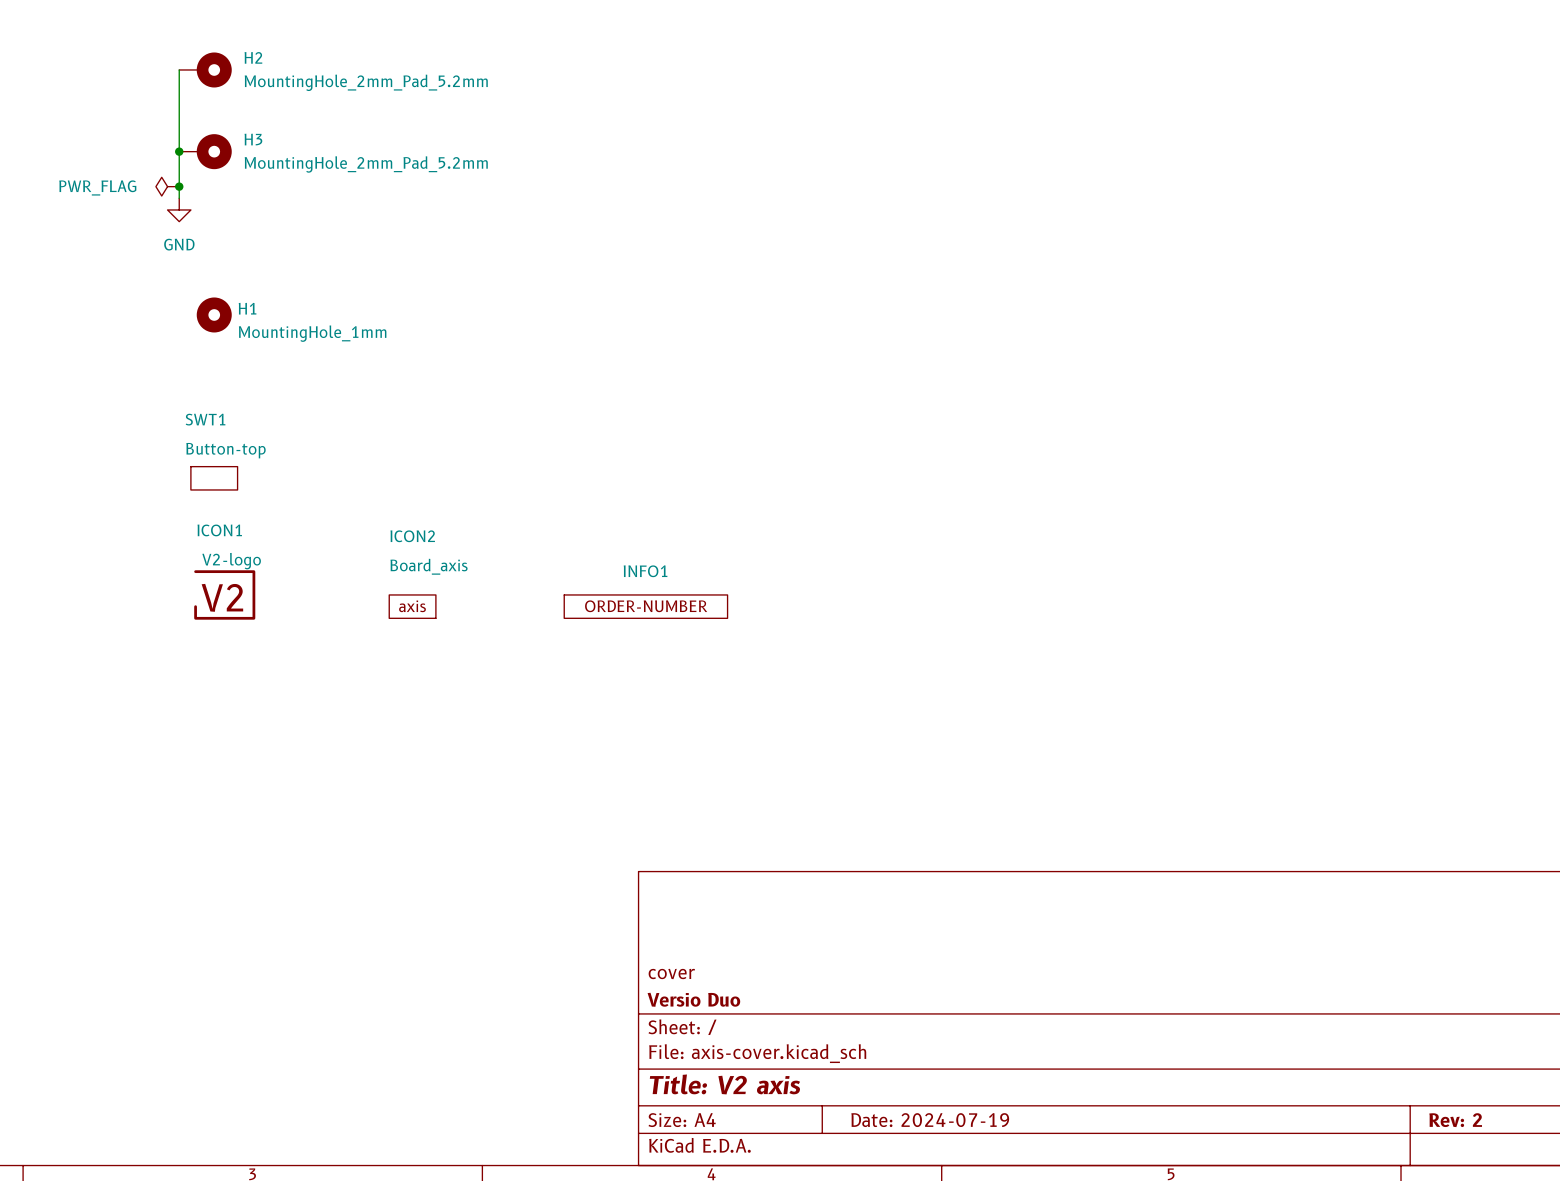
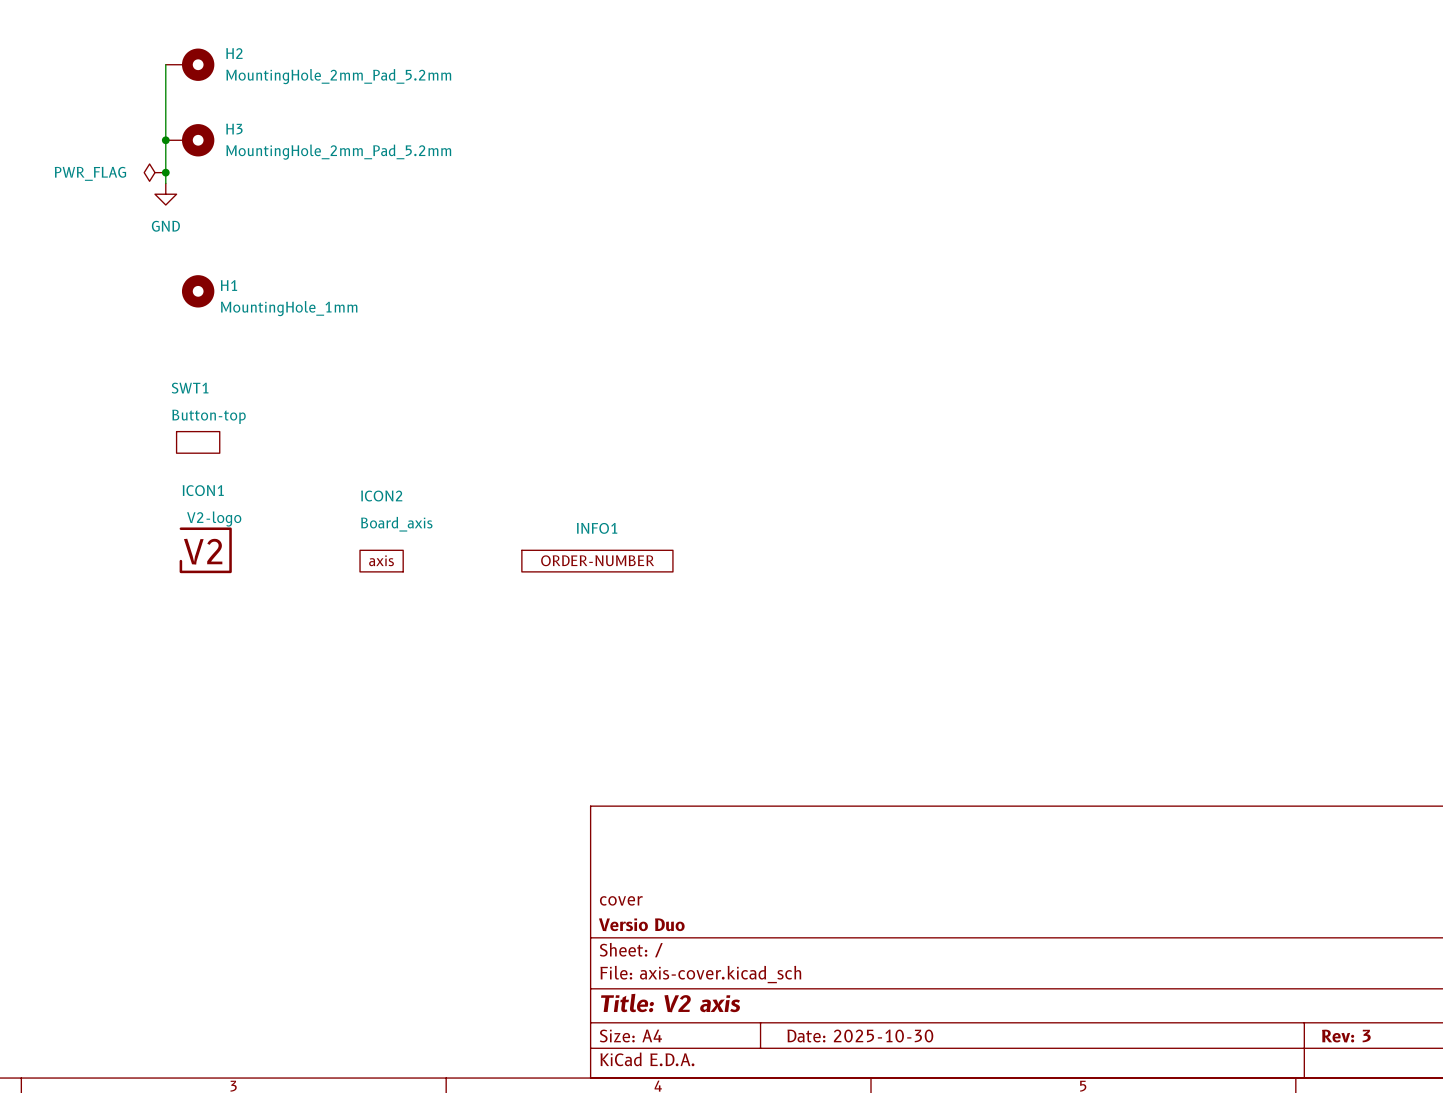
ICON1 symbol: [194, 570, 256, 620] -> [179, 527, 232, 574]
title block: Date: 2024-07-19 (930, 1120) -> Date: 2025-10-30 (860, 1035)
title block: Rev: 2 (1455, 1120) -> Rev: 3 (1346, 1036)

